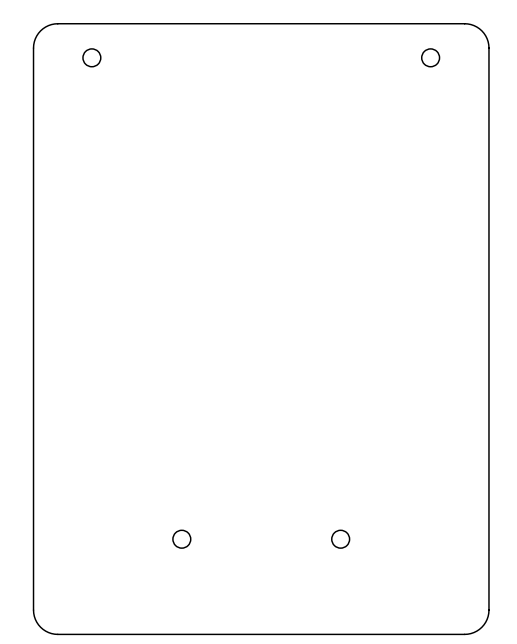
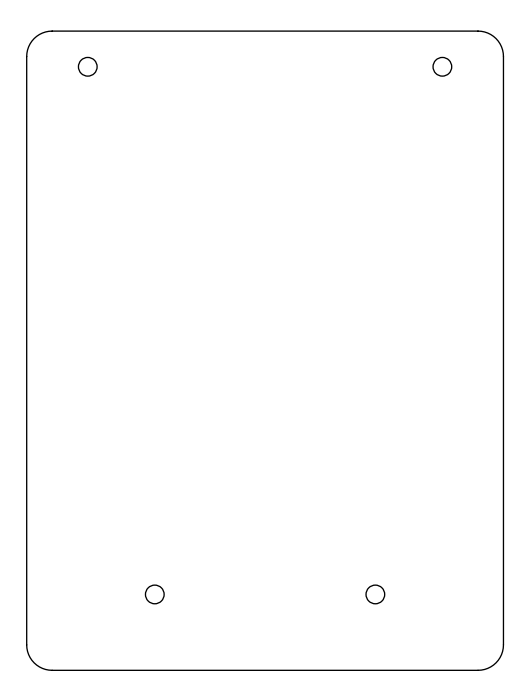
round board edge position: (181, 539) -> (154, 594)
round board edge position: (340, 539) -> (375, 594)

